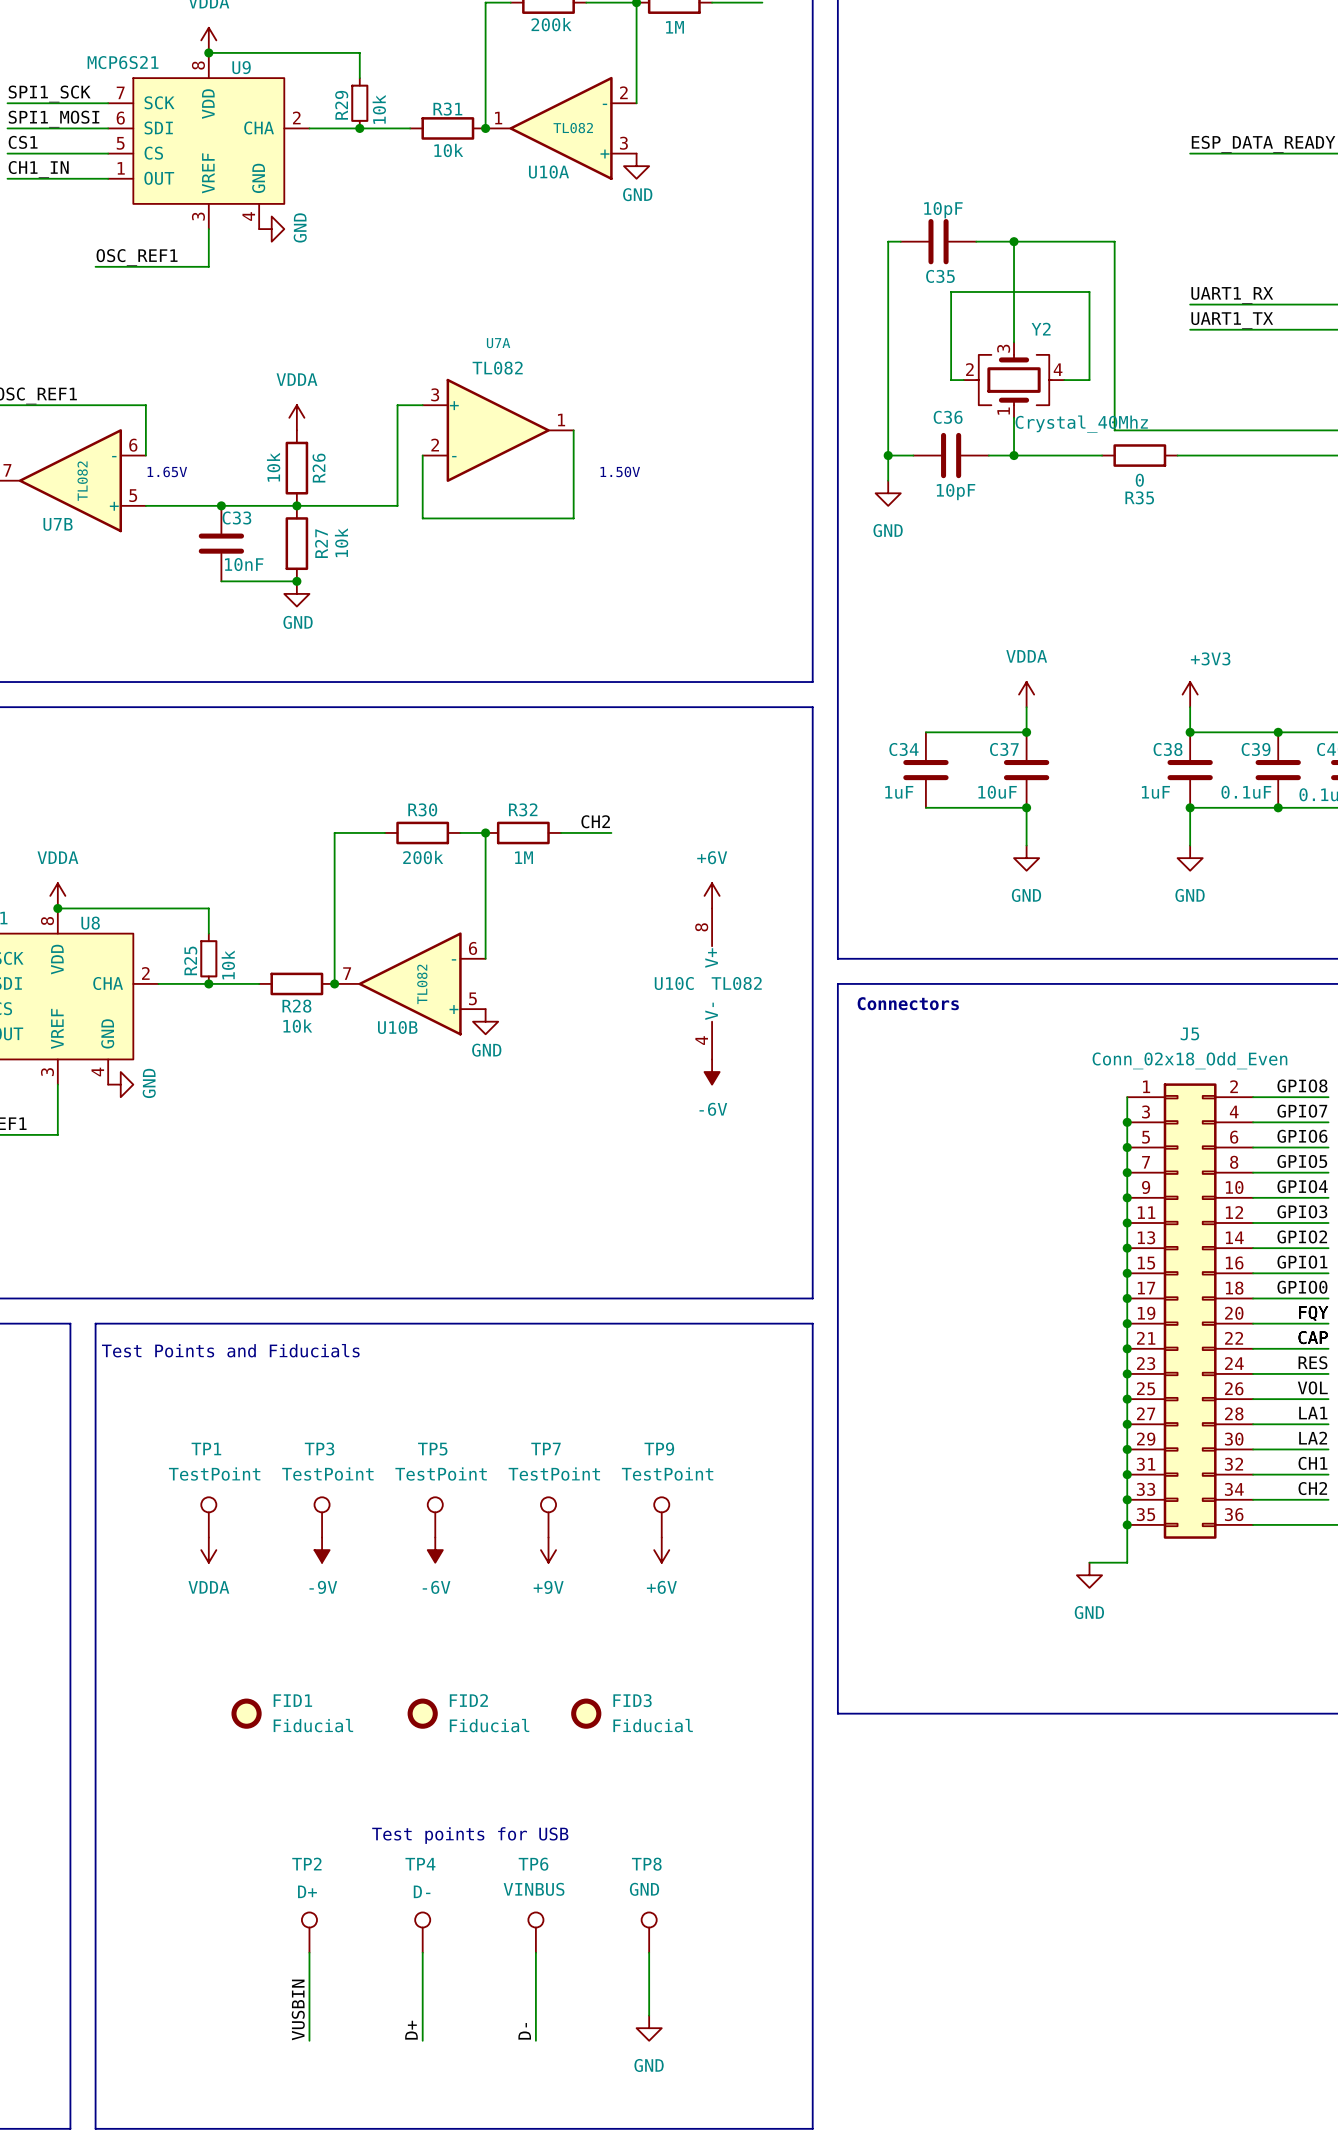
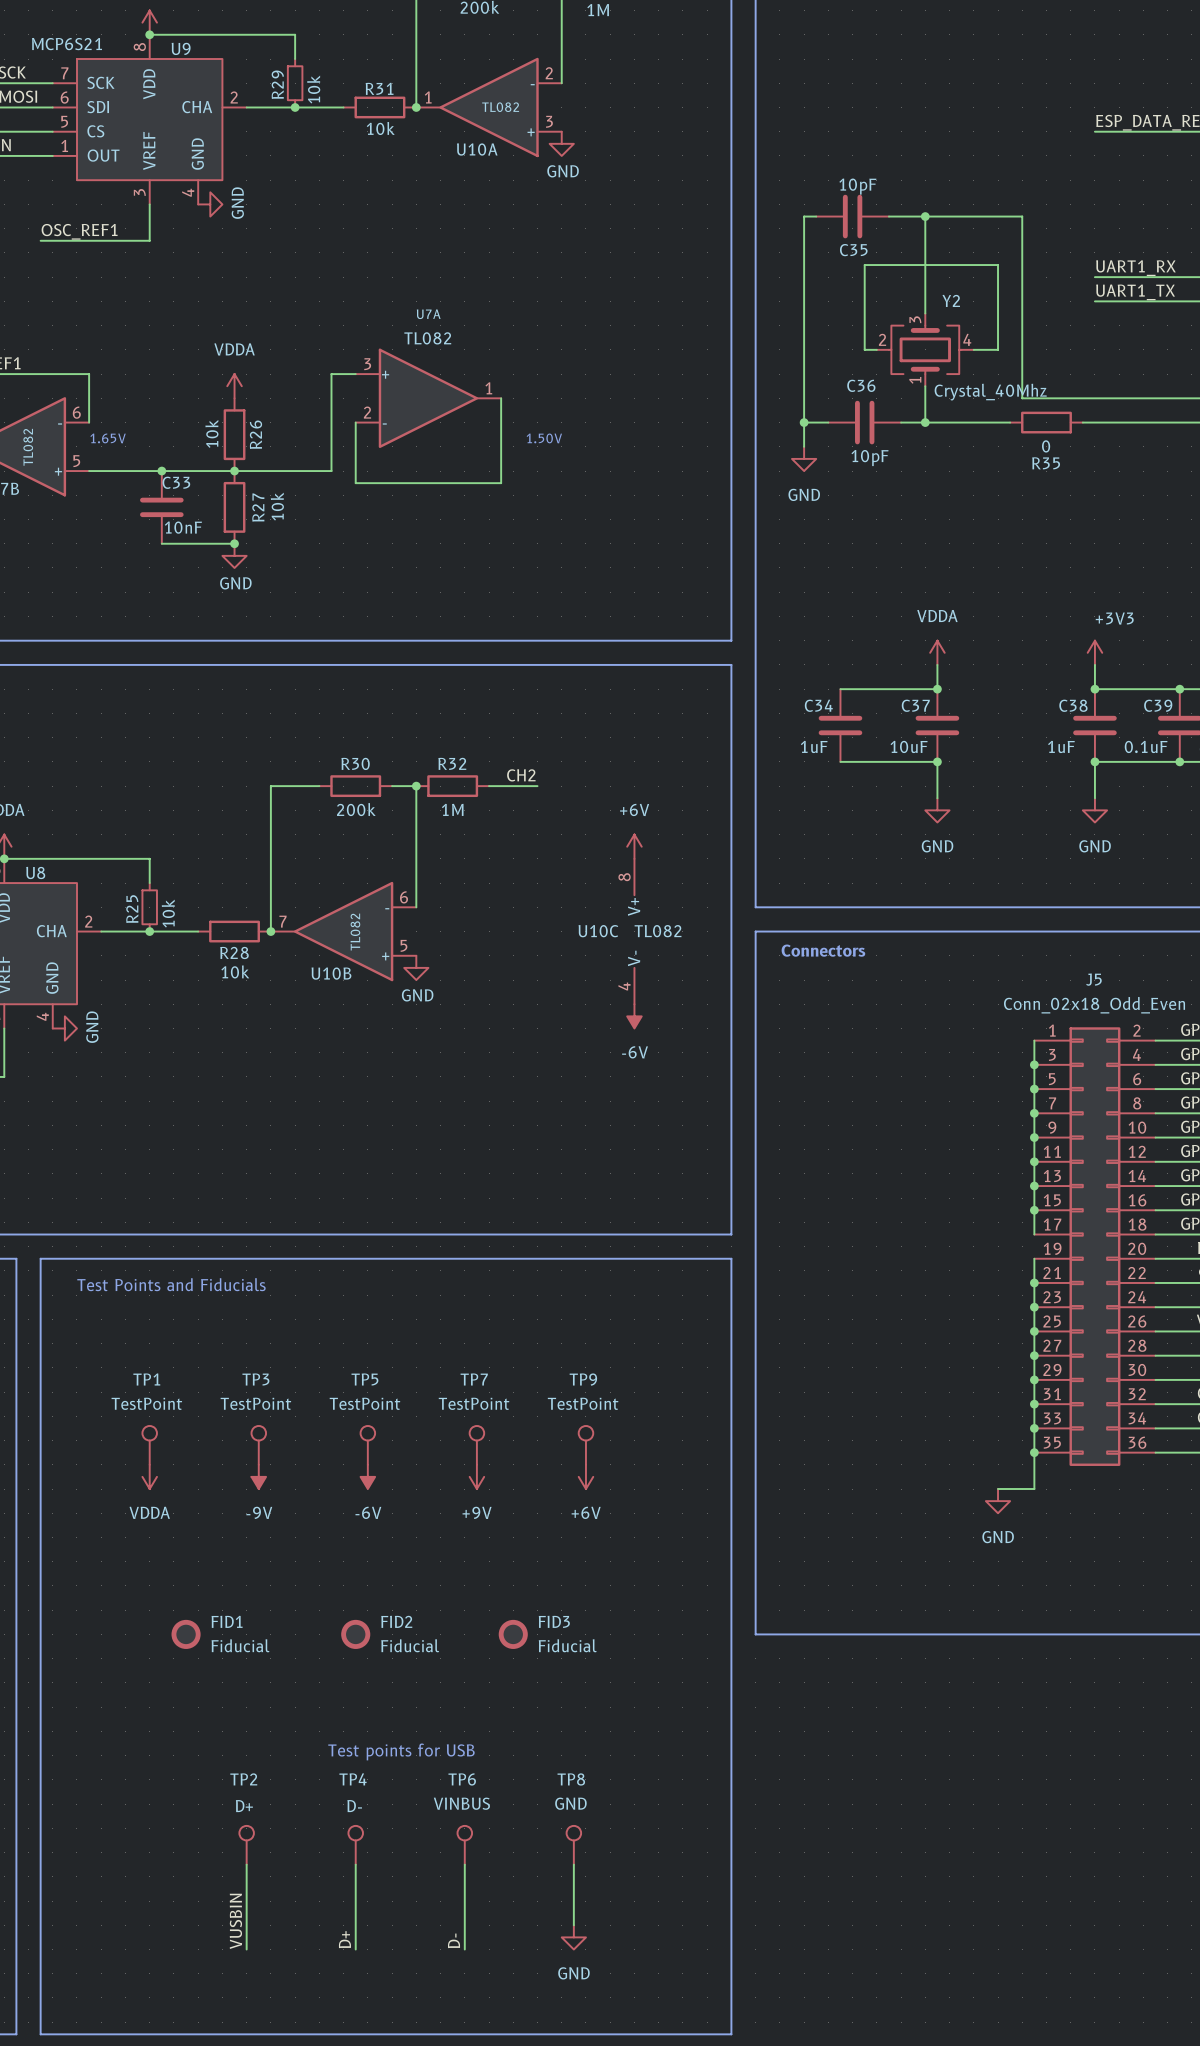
wire: (1127, 1298) (1127, 1323) -> none
junction: (1127, 1298) -> none
junction: (1127, 1323) -> none

